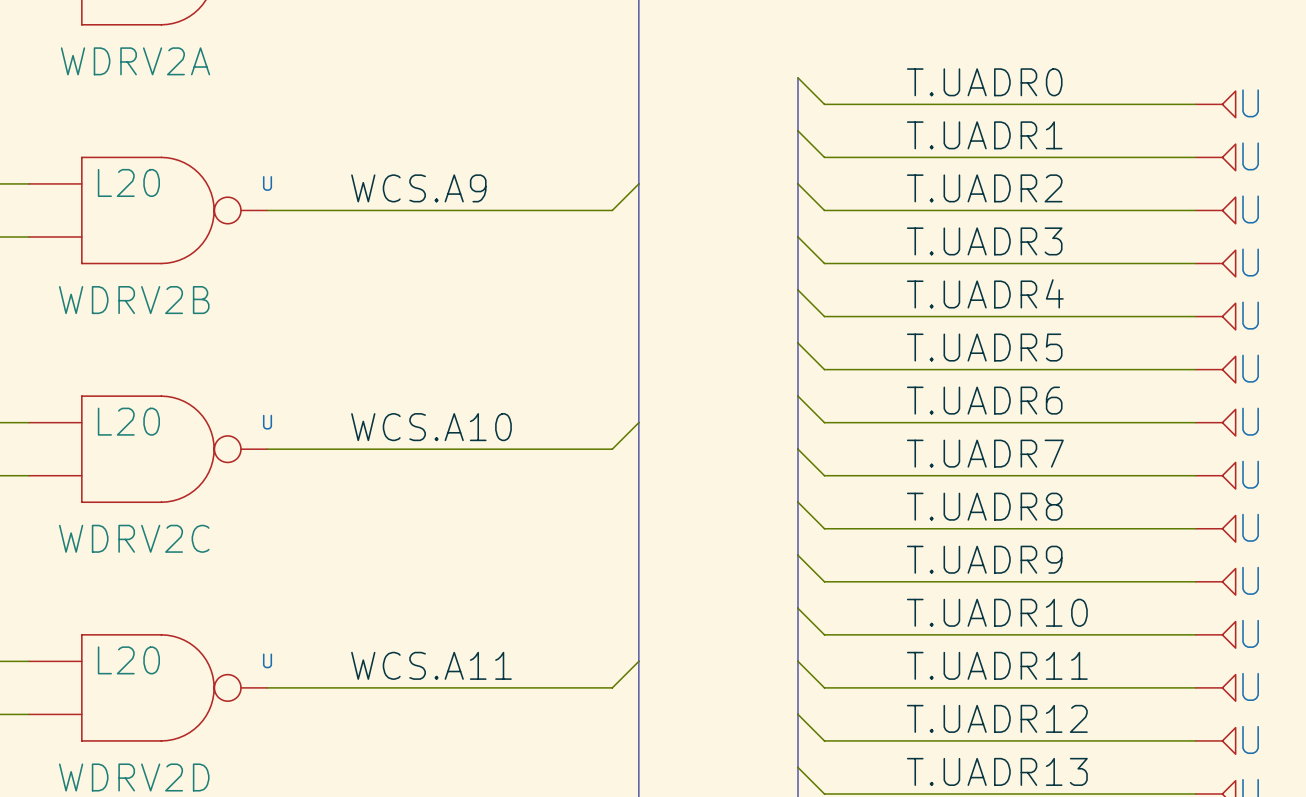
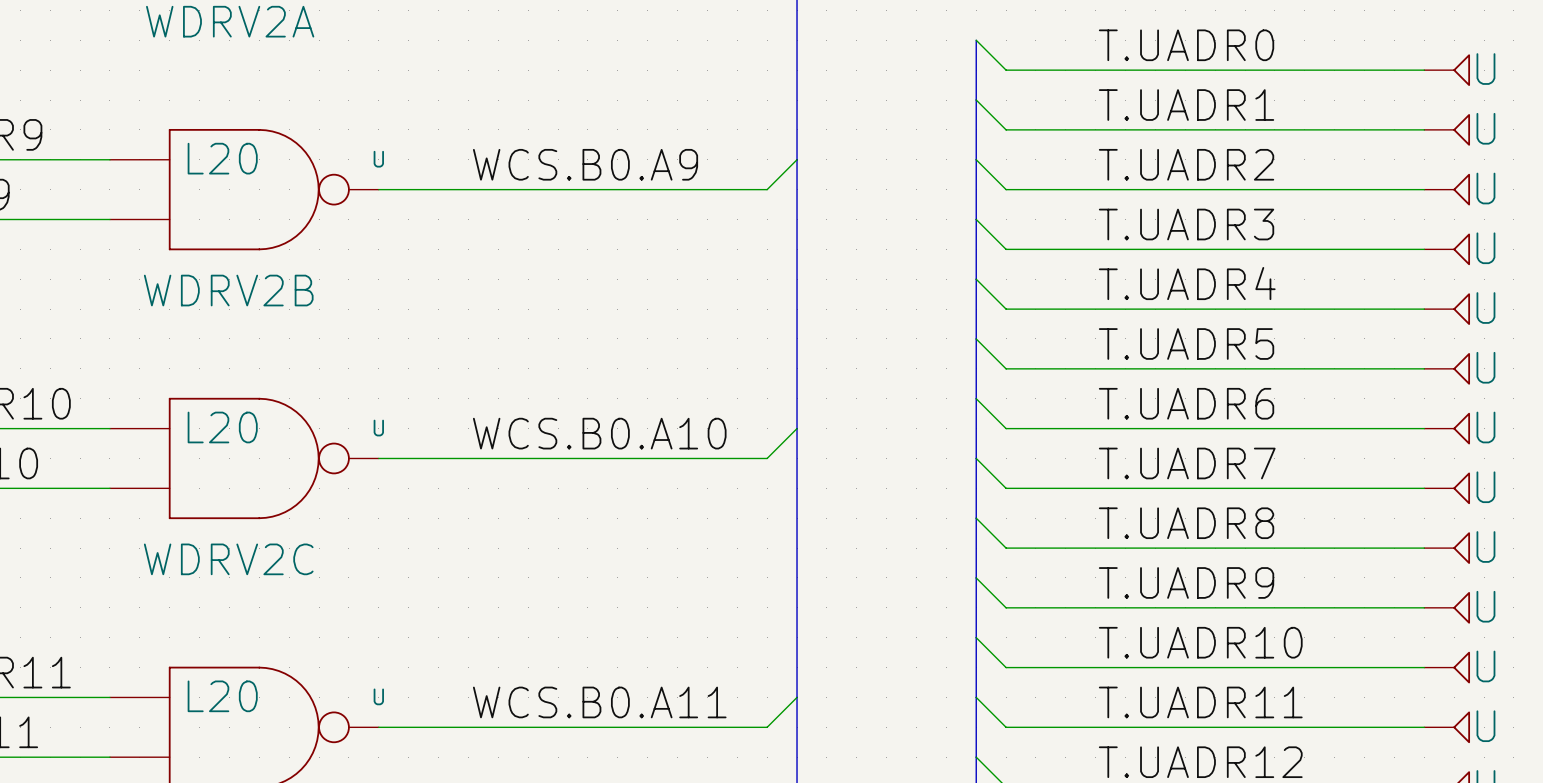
label: WCS.A9 (418, 188) -> WCS.B0.A9 (585, 164)
label: WCS.A10 (431, 427) -> WCS.B0.A10 (599, 433)
label: WCS.A11 (431, 665) -> WCS.B0.A11 (599, 702)

